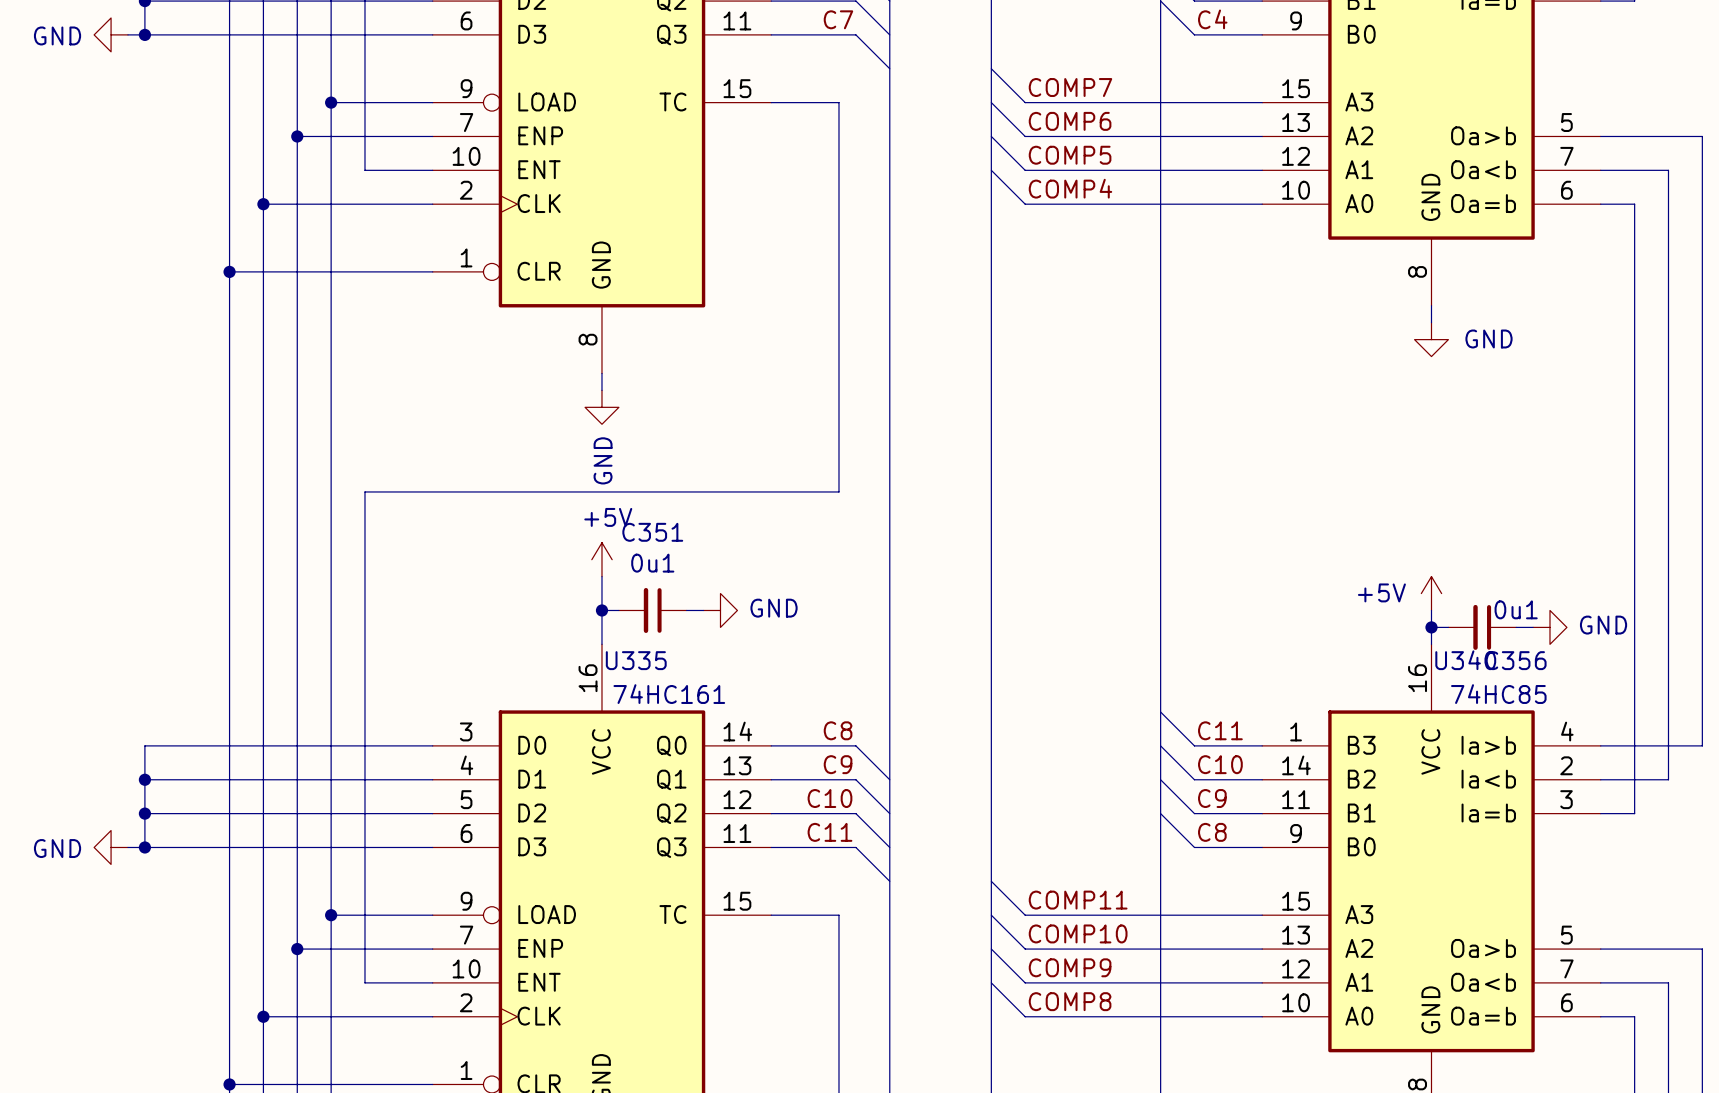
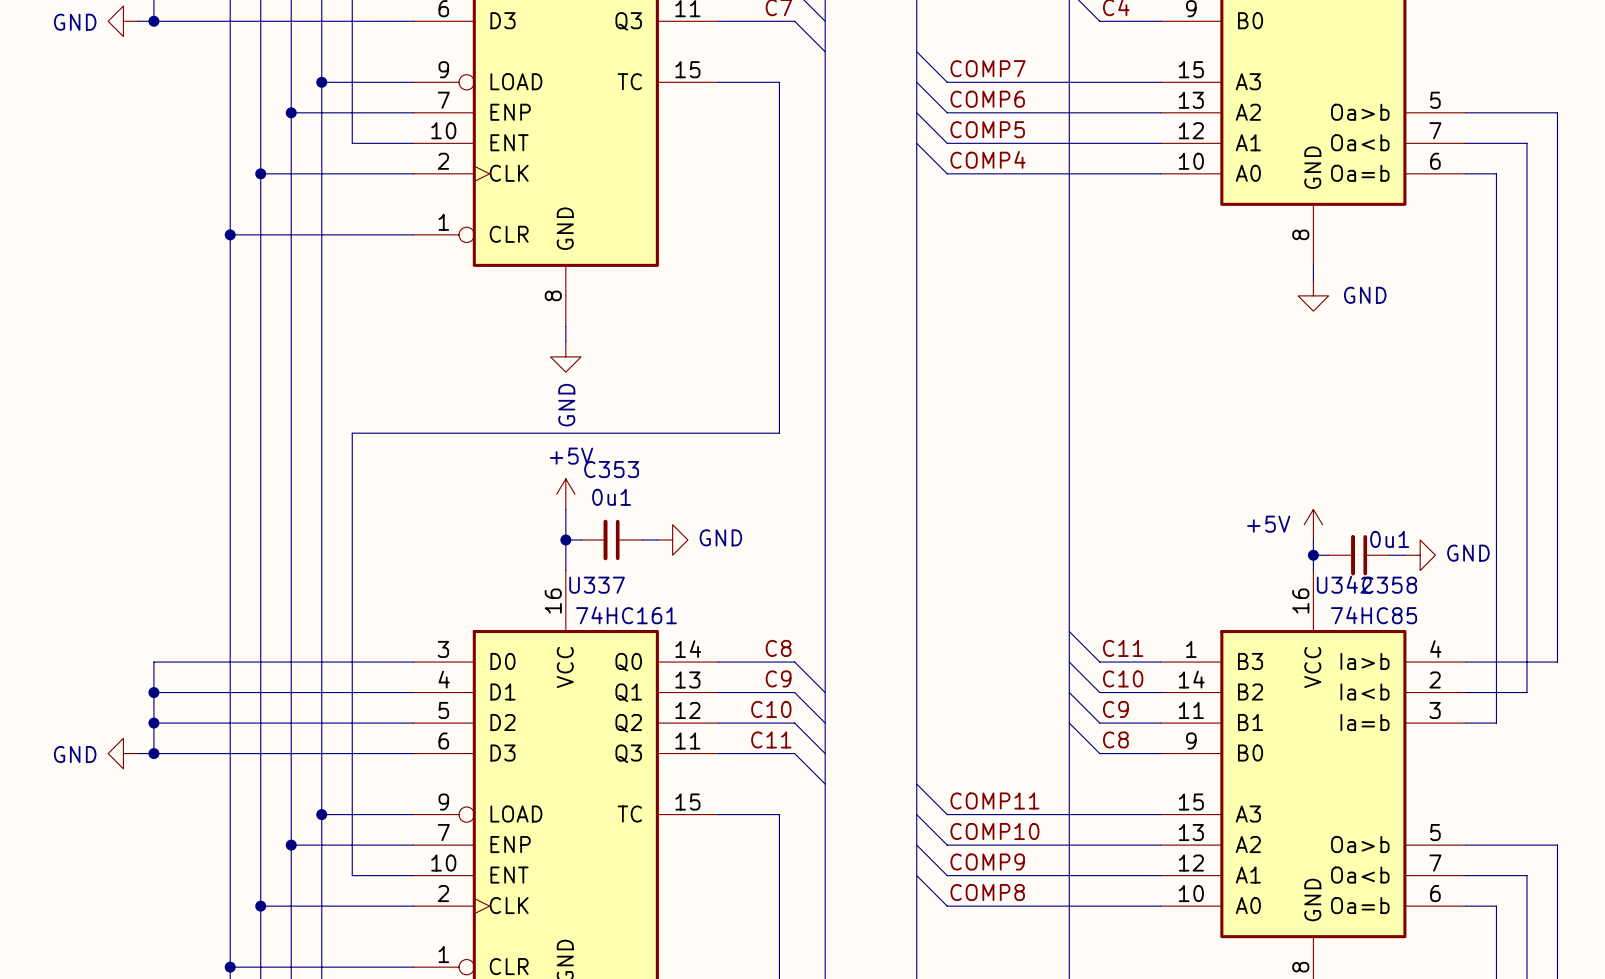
C351 name: C351 (652, 532) -> C353 (611, 469)
U335 name: U335 (636, 660) -> U337 (597, 585)
U340 name: U340 (1465, 660) -> U342 (1344, 584)
C356 name: C356 (1516, 660) -> C358 (1389, 585)

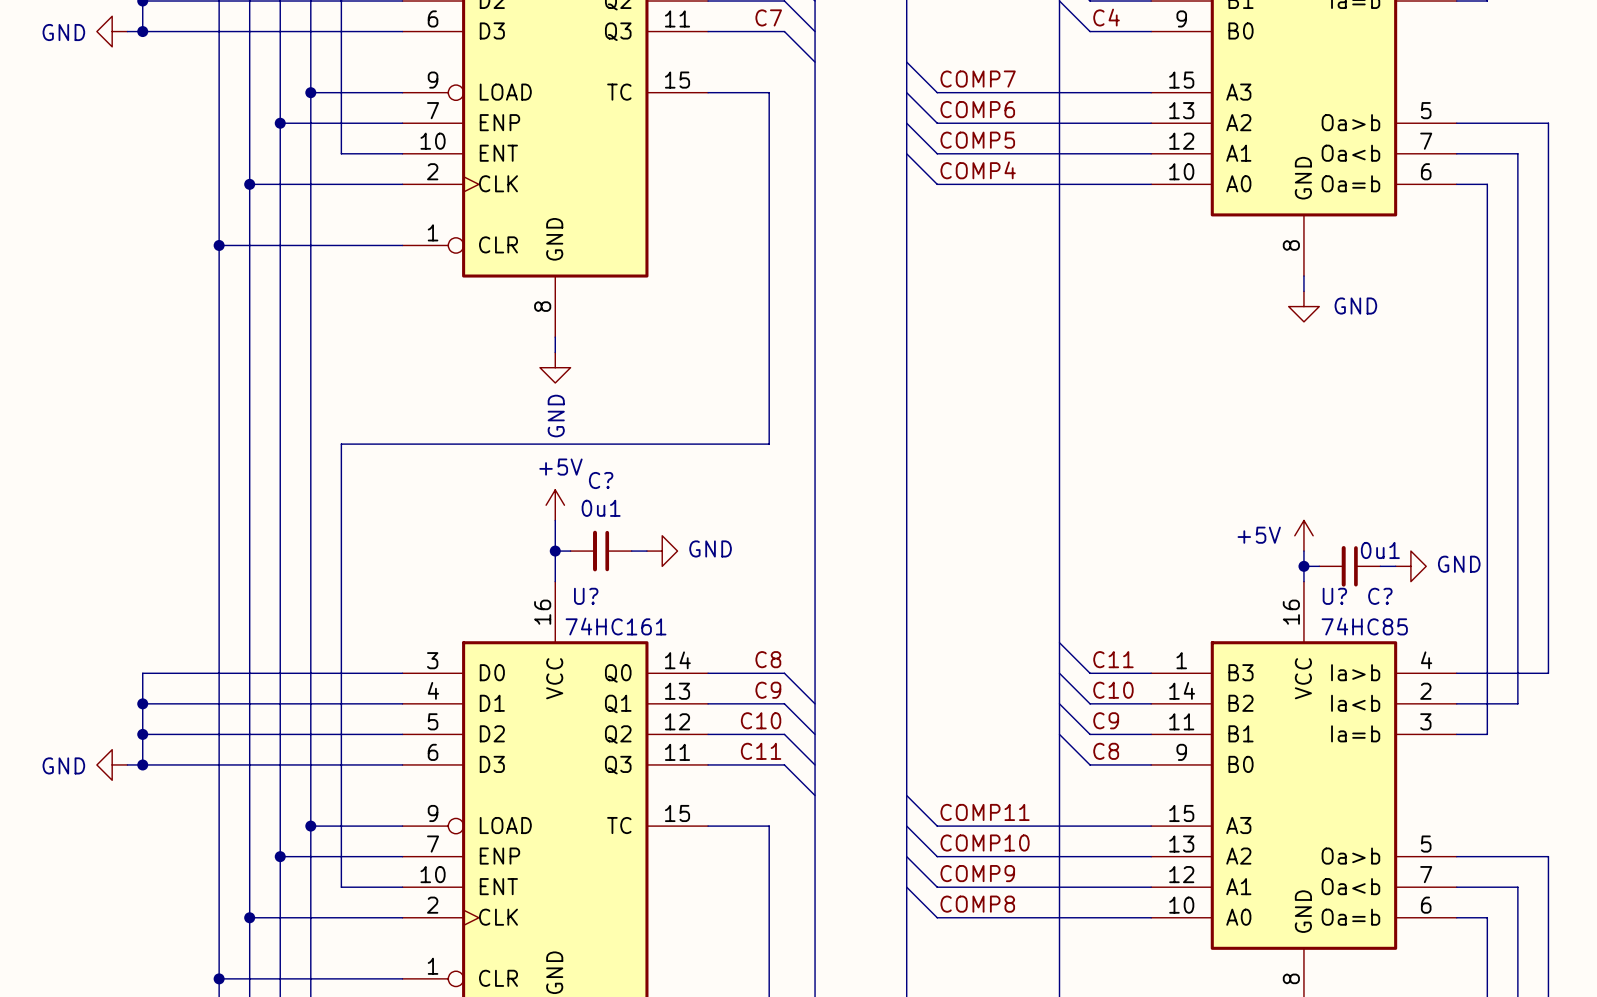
C353 name: C353 (611, 469) -> C? (601, 480)
U342 name: U342 (1344, 584) -> U? (1334, 596)
U337 name: U337 (597, 585) -> U? (586, 596)
C358 name: C358 (1389, 585) -> C? (1380, 596)

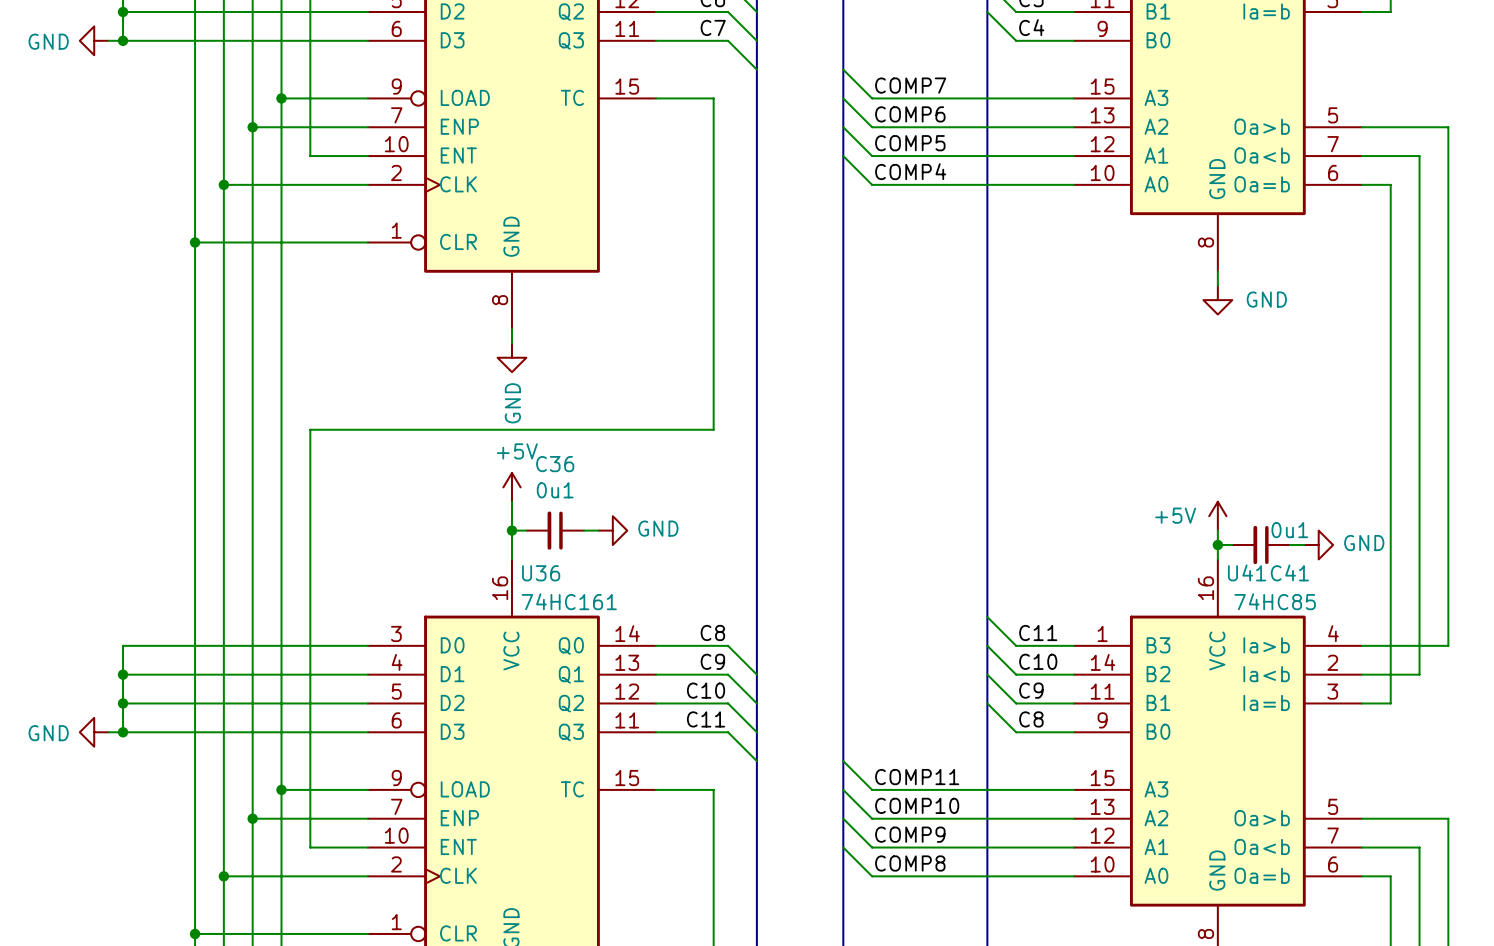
C? name: C? (601, 480) -> C36 (555, 464)
U? name: U? (586, 596) -> U36 (541, 573)
U? name: U? (1334, 596) -> U41 (1247, 572)
C? name: C? (1380, 596) -> C41 (1289, 572)

